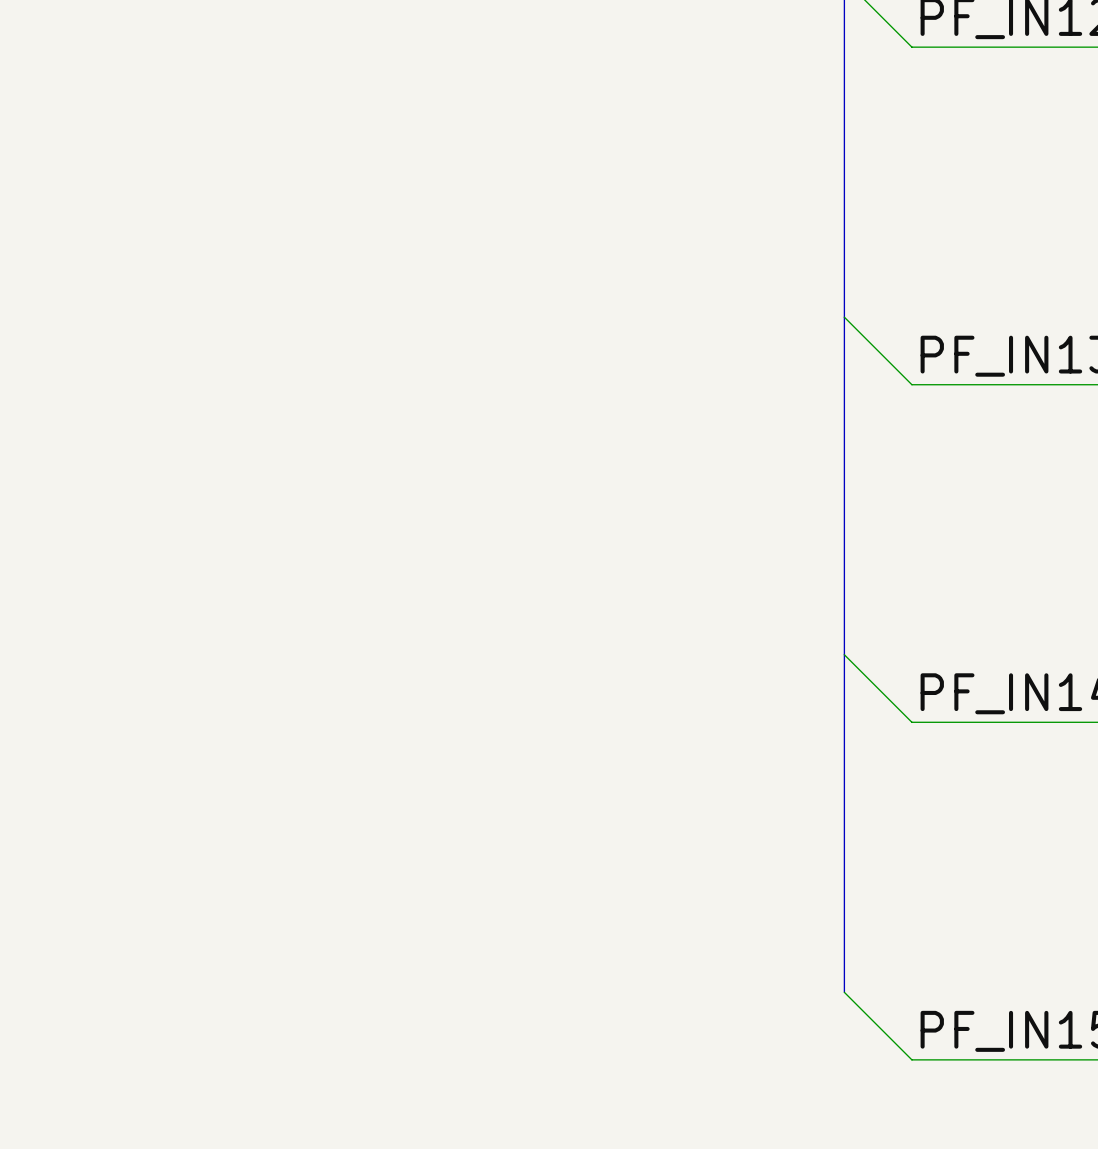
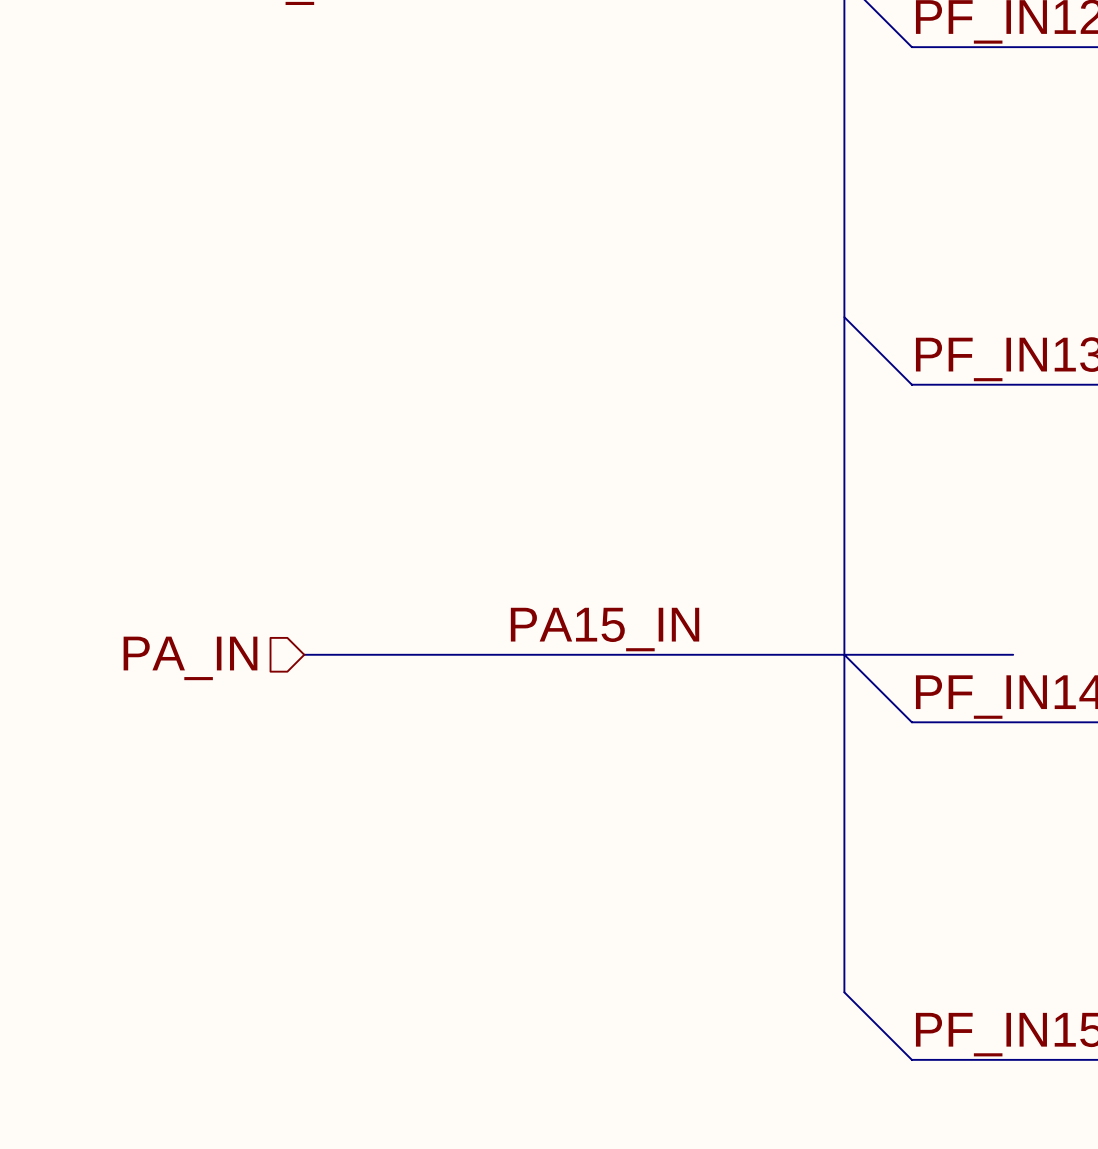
label: none -> PA15_IN (605, 629)
wire: none -> (304, 654) (1013, 654)
hierarchical label: none -> PA_IN (190, 658)

